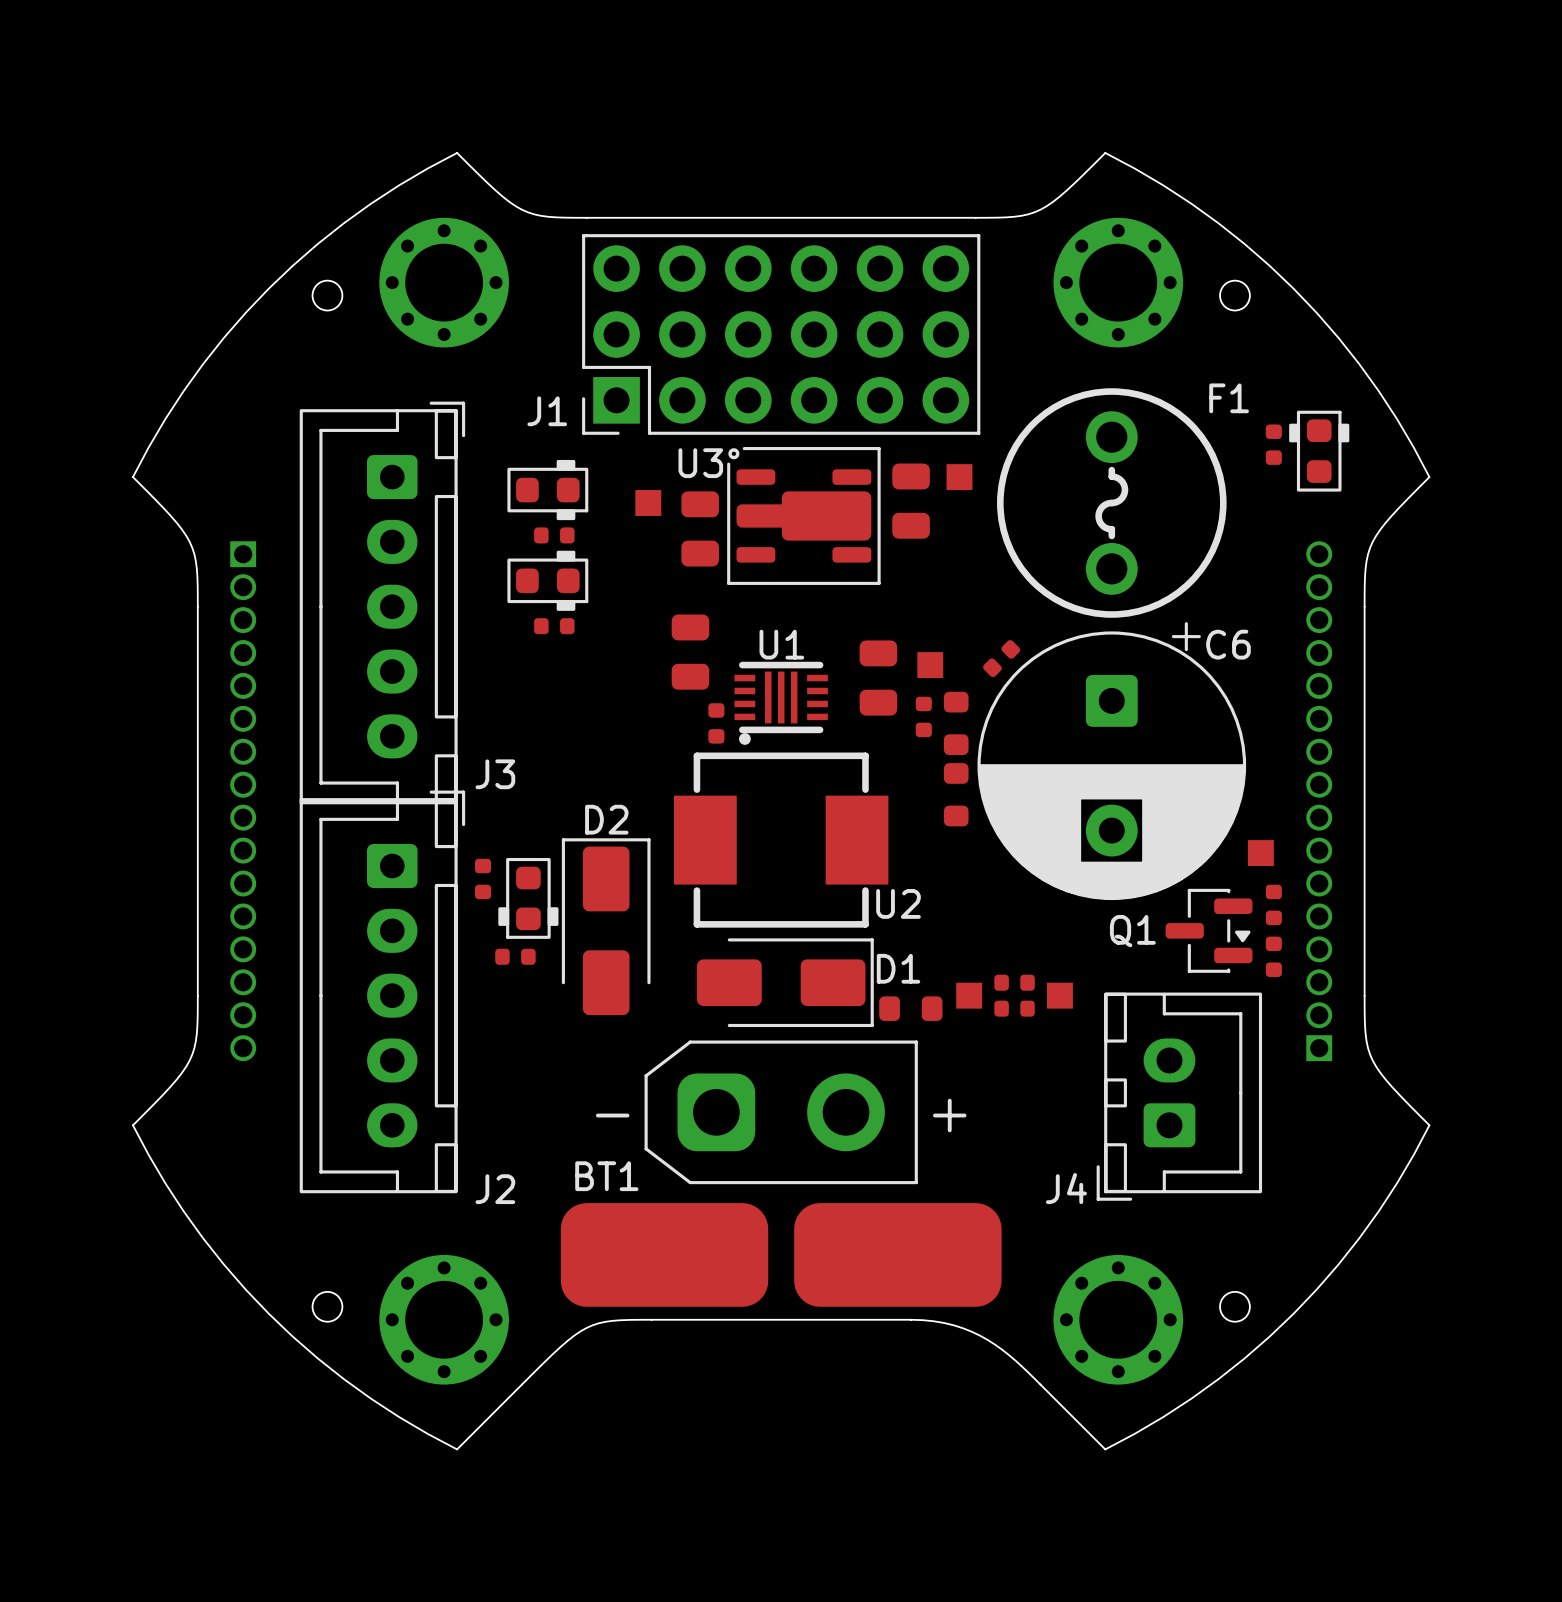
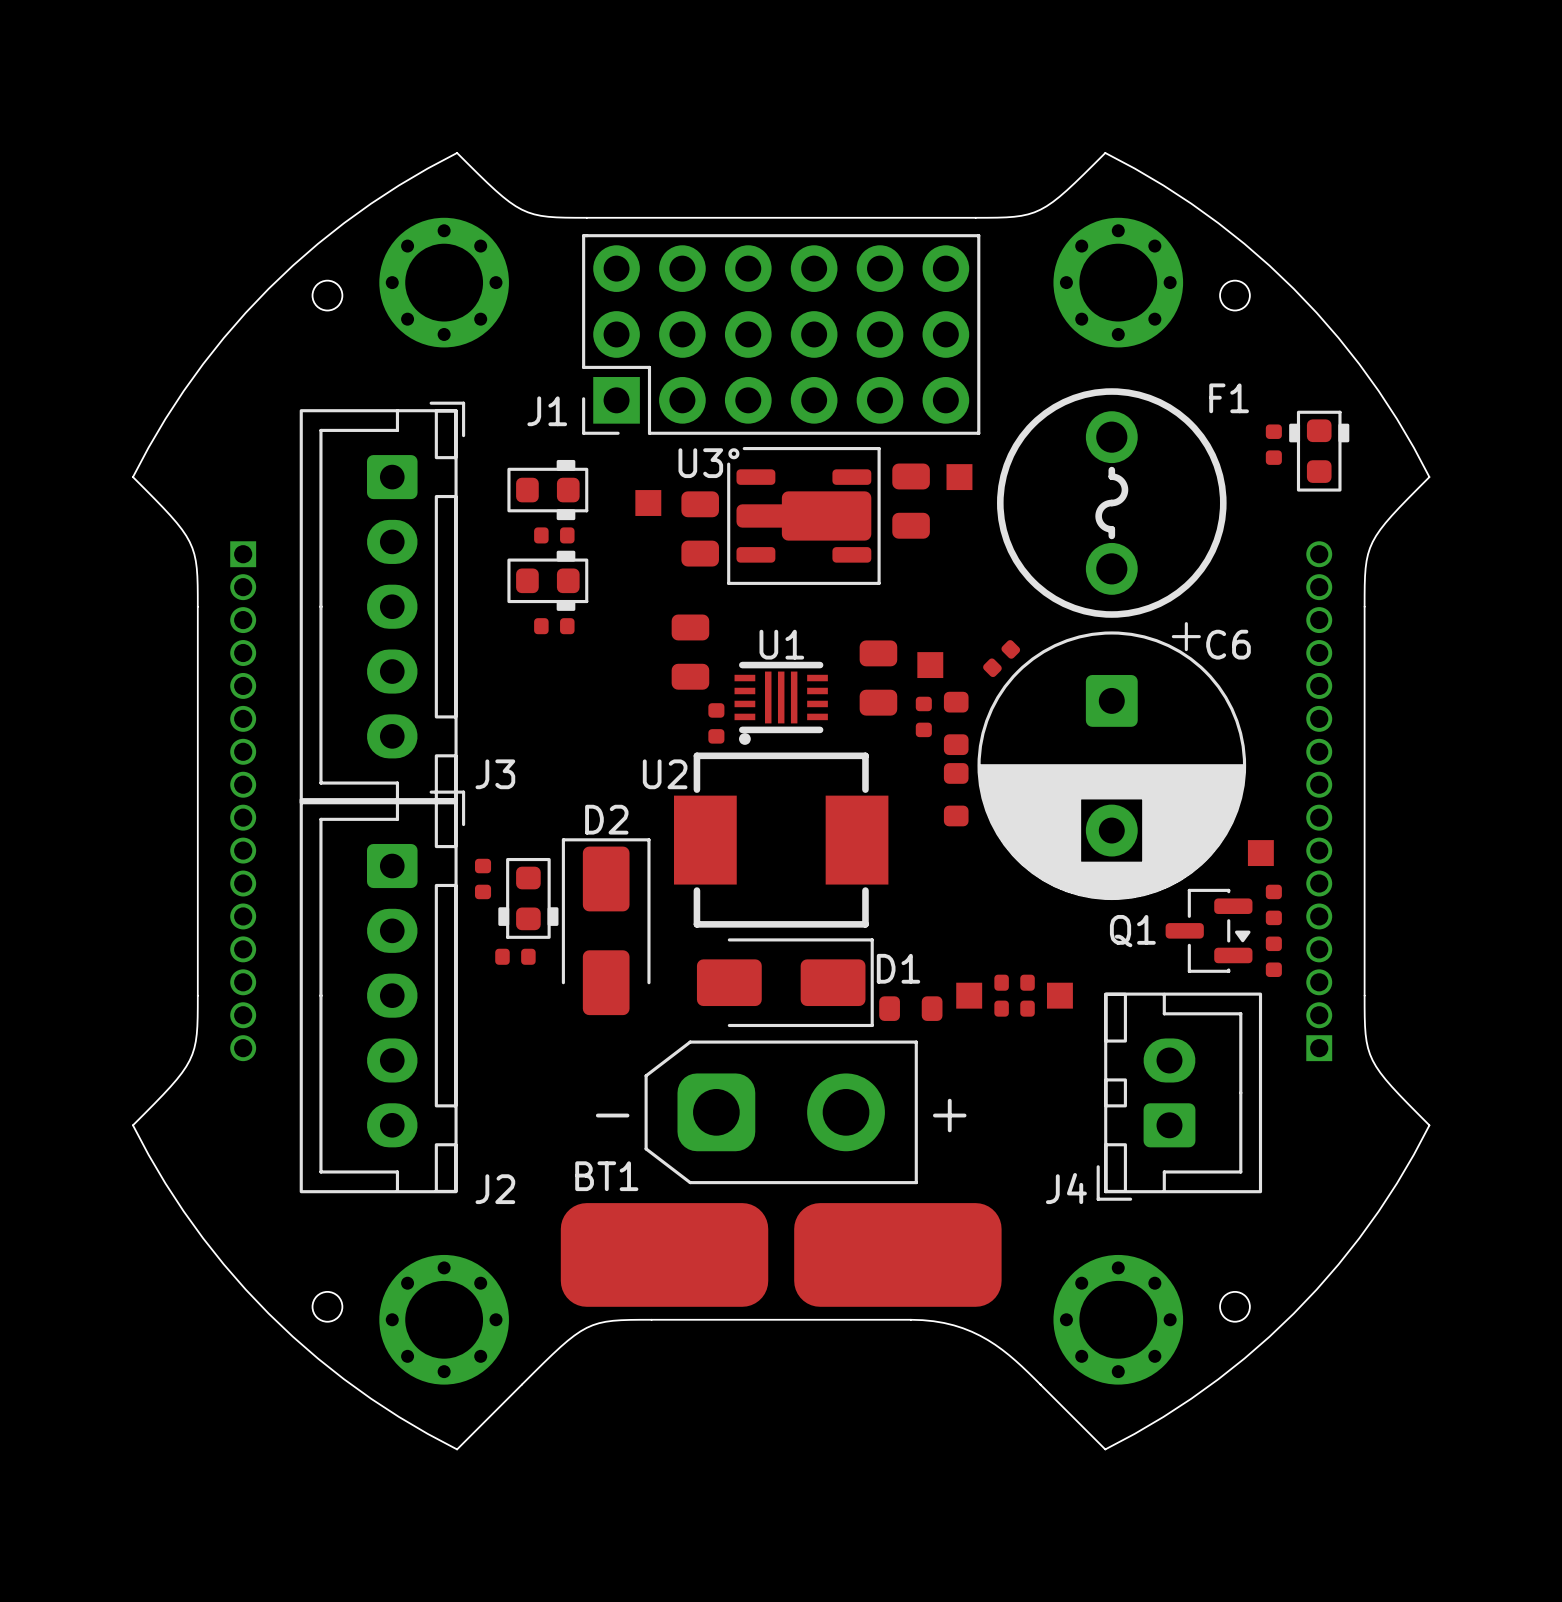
U2 name position: U2 (898, 903) -> U2 (665, 774)

